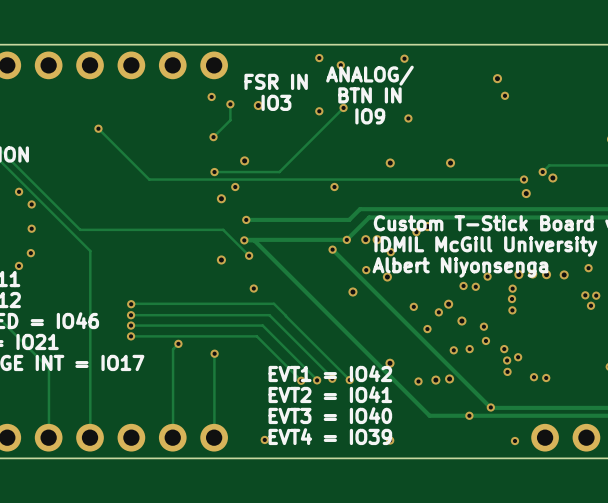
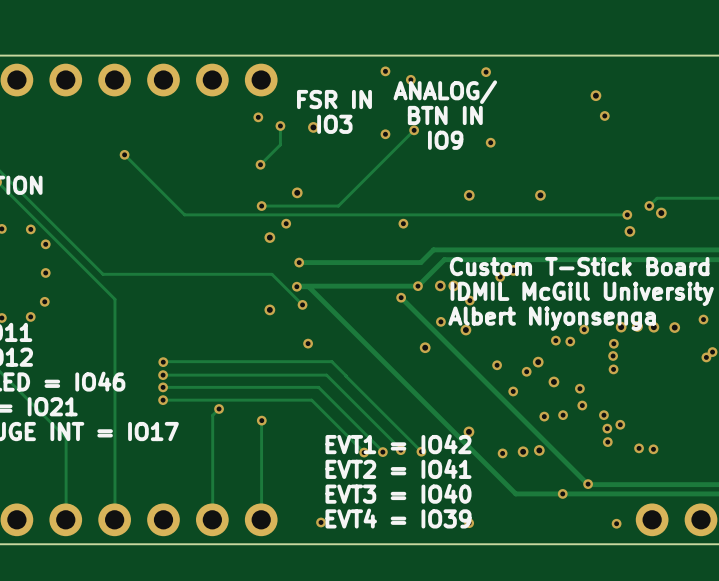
via: (585, 295) -> none
via: none -> (706, 357)
via: (591, 305) -> none

